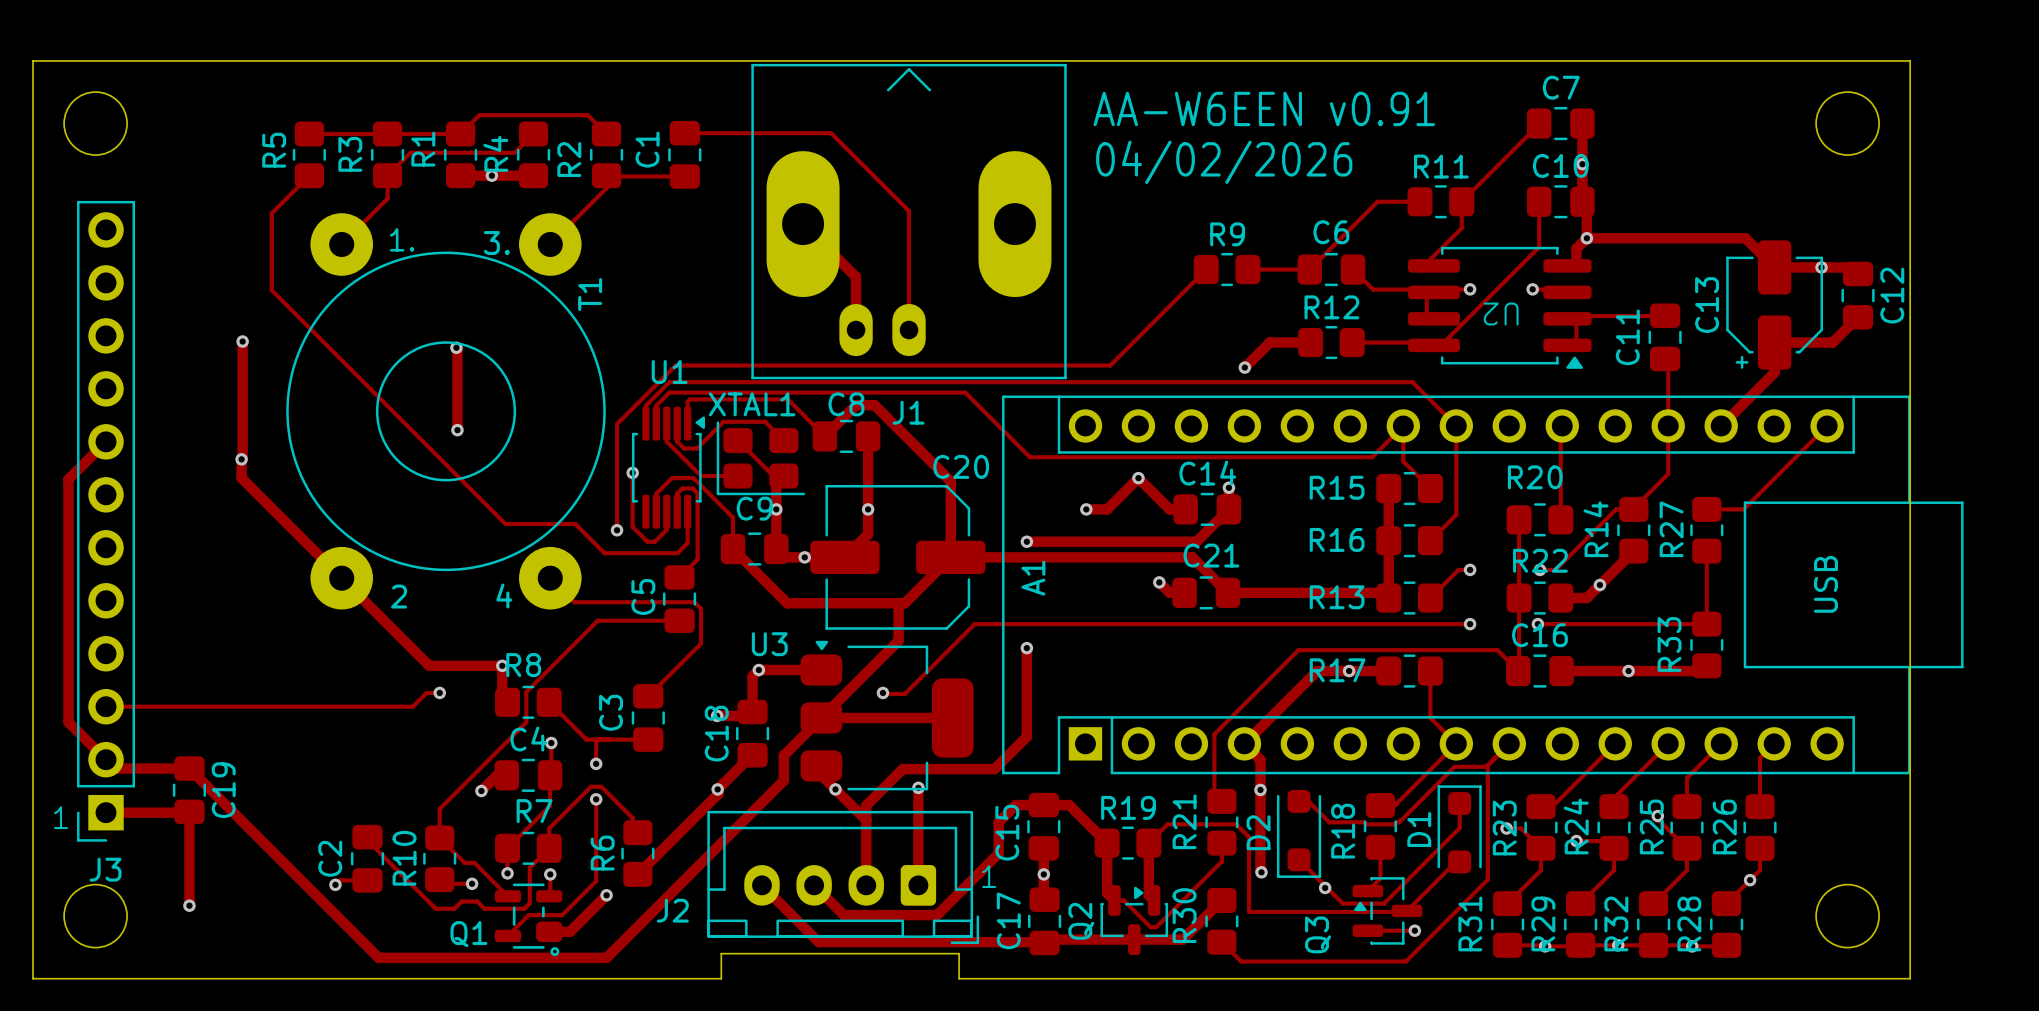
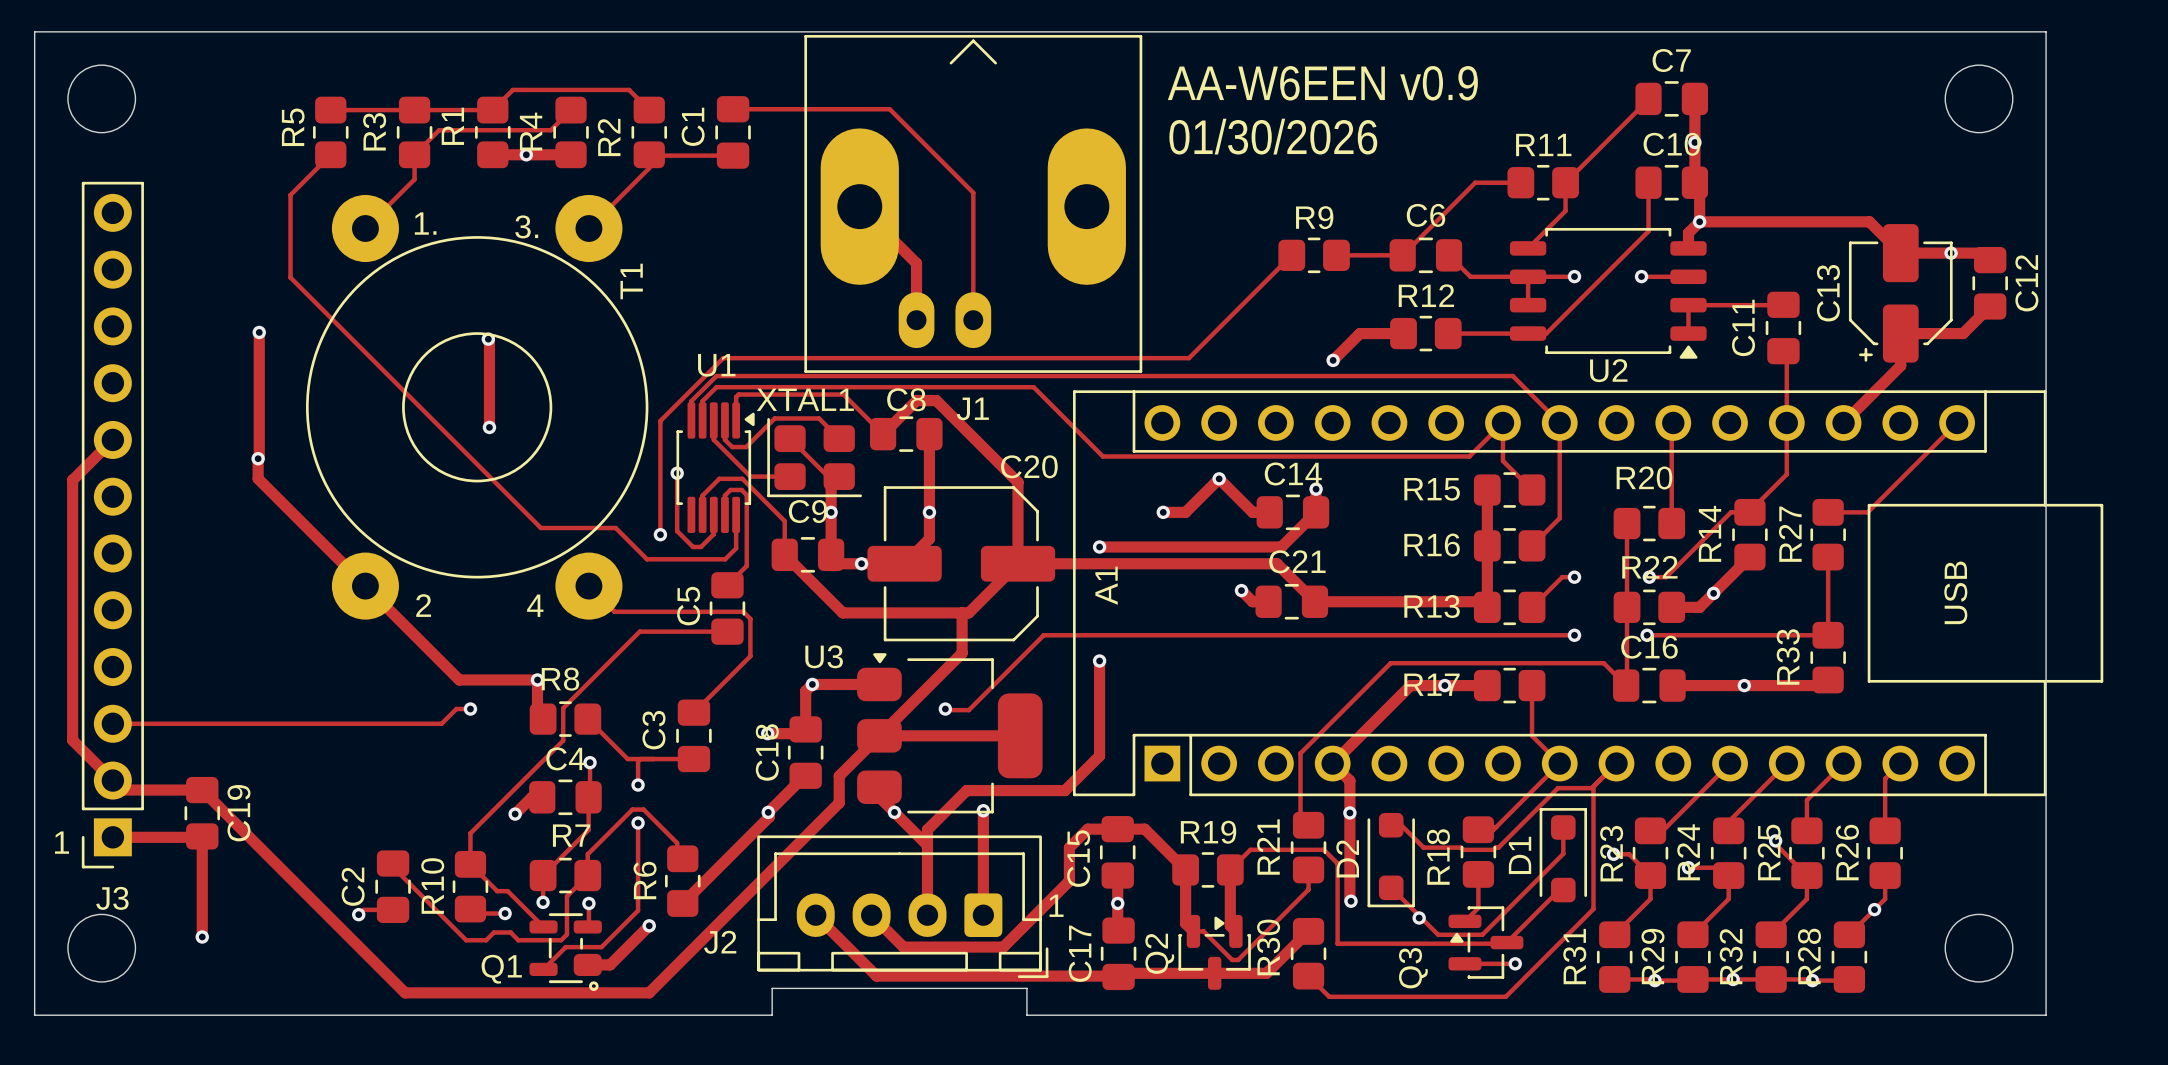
text: AA-W6EEN v0.91 (1264, 108) -> AA-W6EEN v0.9 (1322, 83)
text: 04/02/2026 (1224, 162) -> 01/30/2026 (1273, 136)
U2 footprint: [1408, 246, 1592, 369] -> [1509, 227, 1707, 359]
U2 name rotation: 0° (1501, 314) -> 180° (1608, 370)
U2 name position: U2 (1501, 314) -> U2 (1608, 370)

